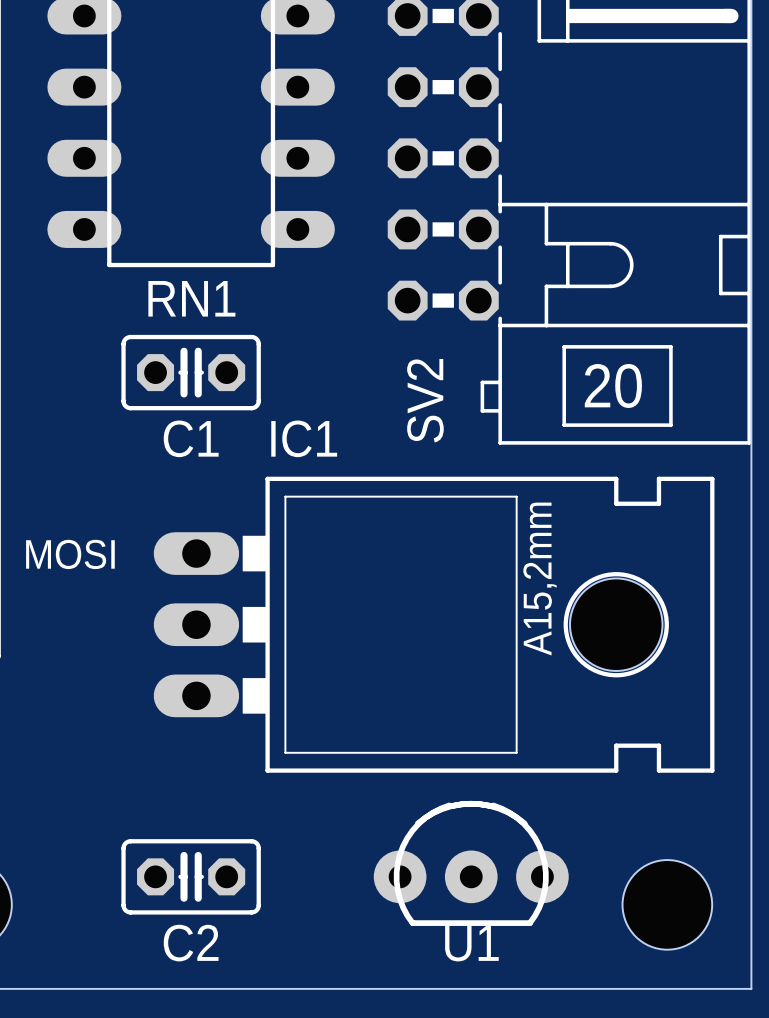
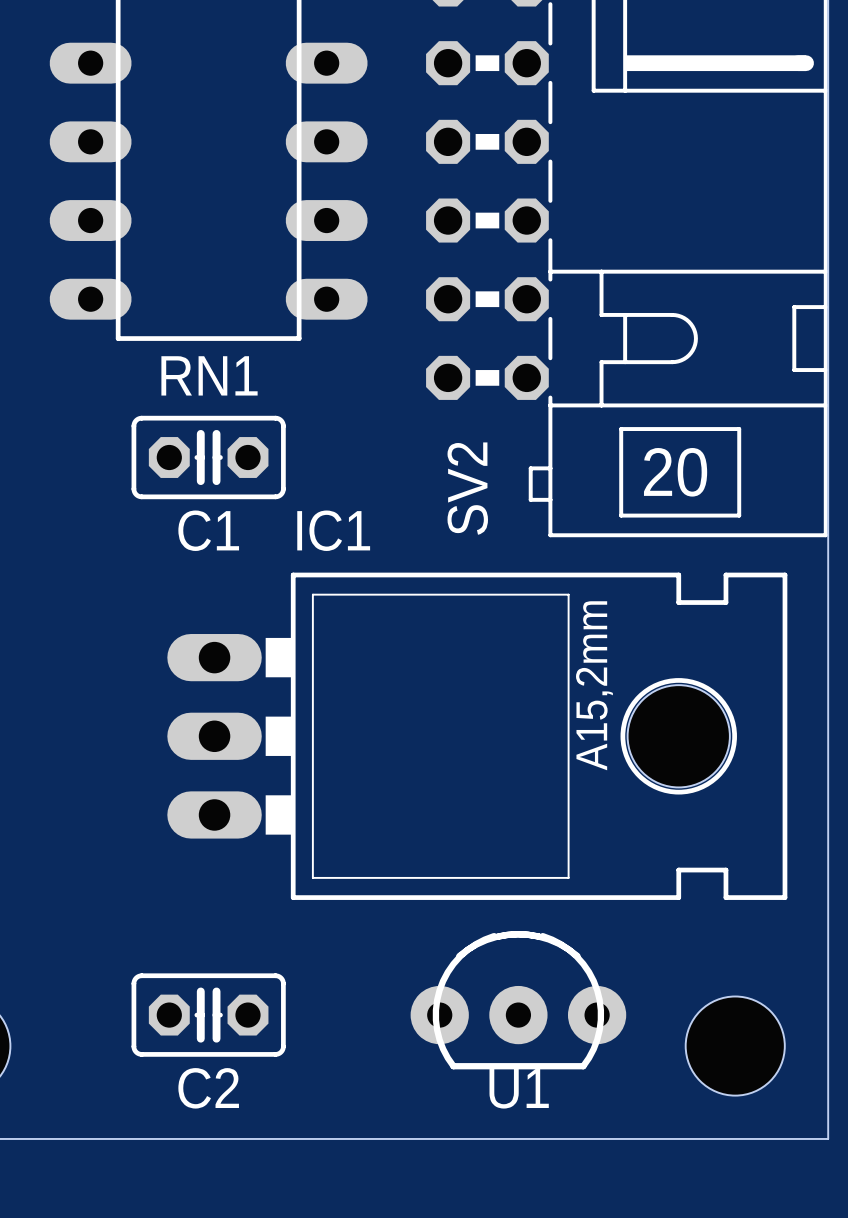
text: MOSI (70, 554) -> none

